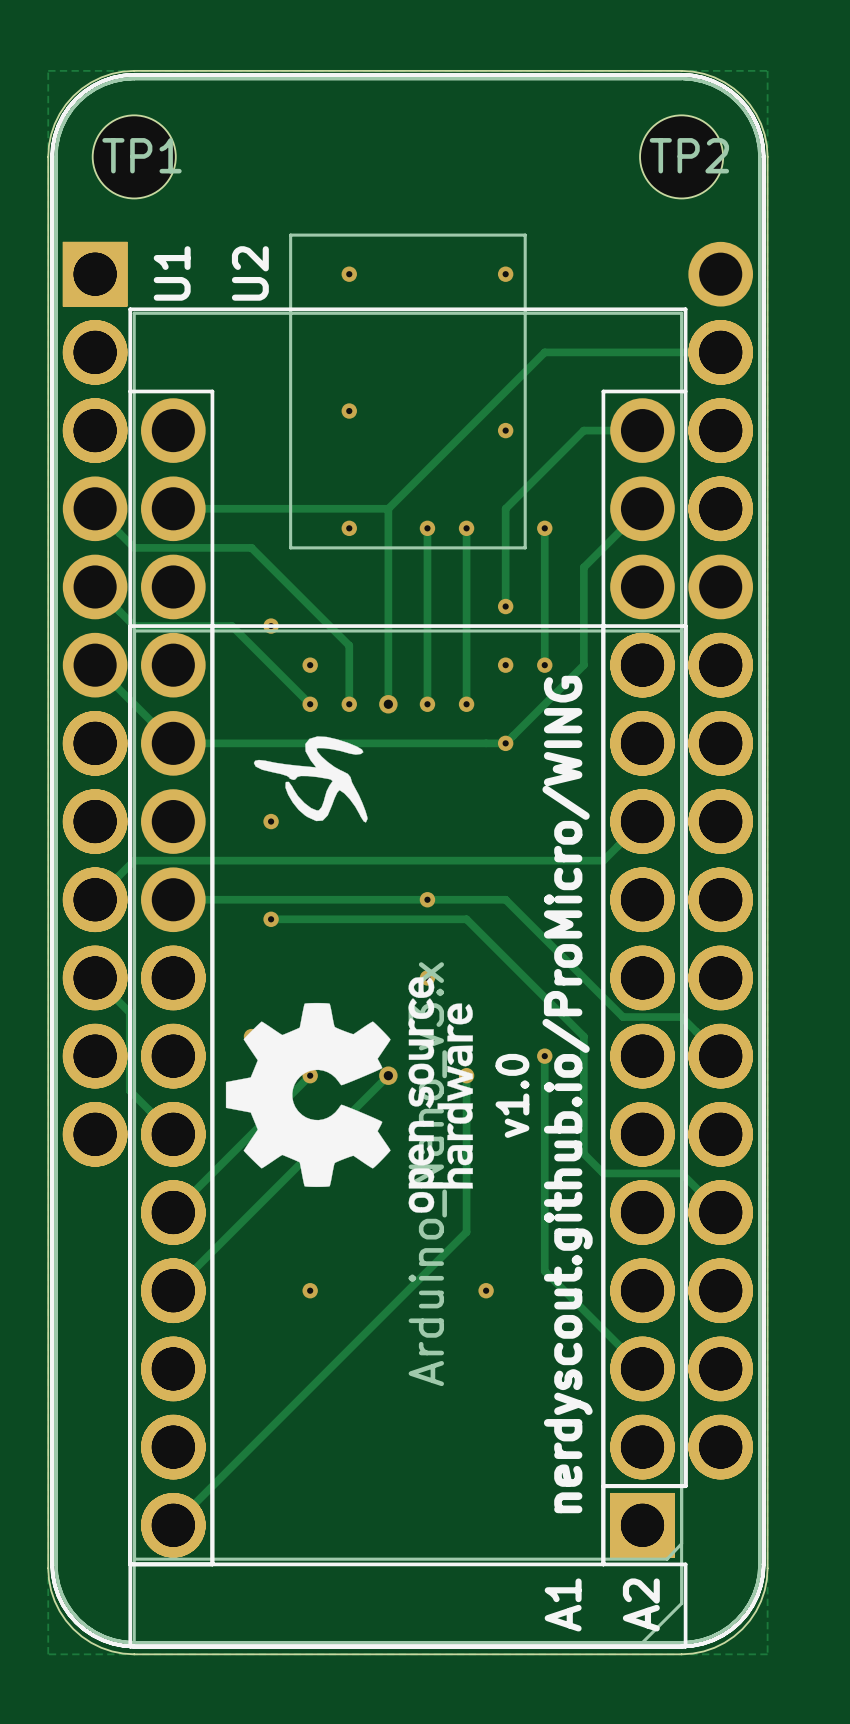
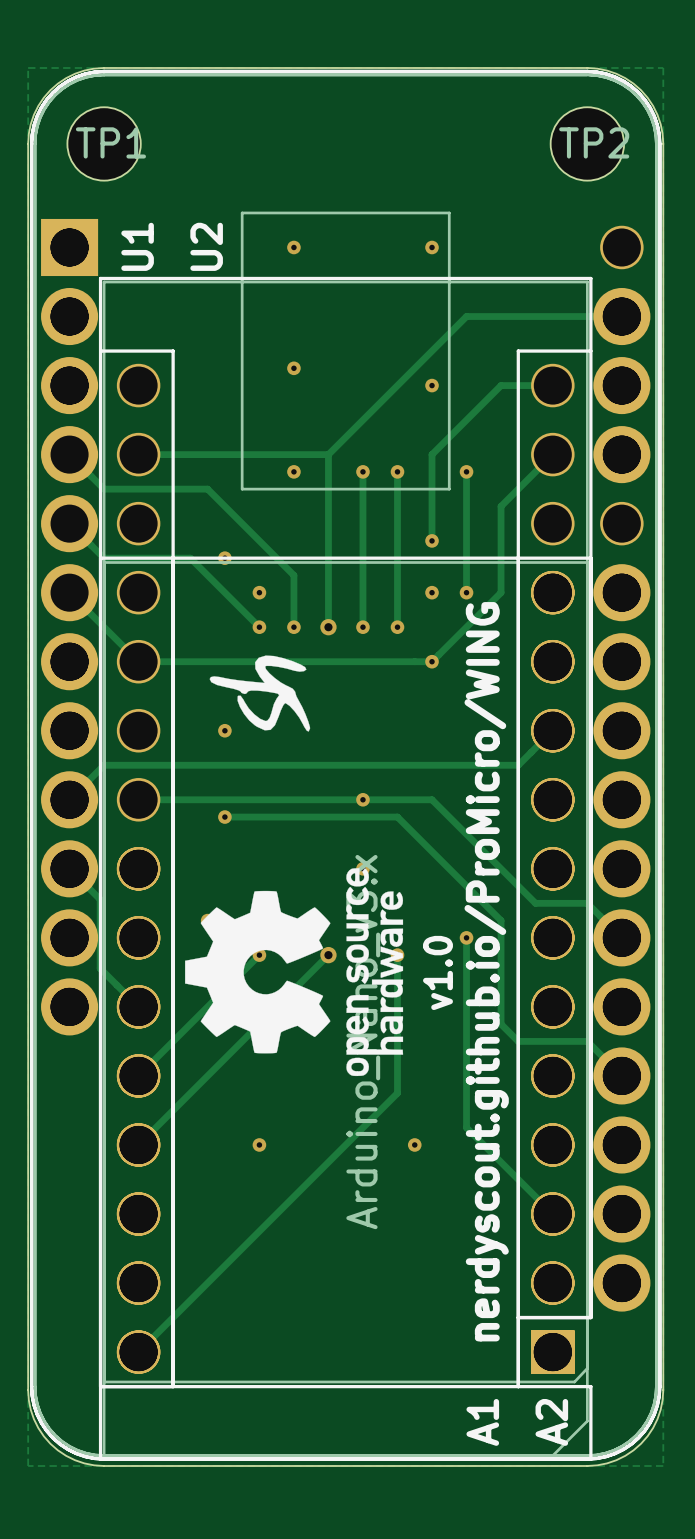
U2 footprint: [50, 72, 766, 1649] -> [29, 69, 662, 1461]
A2 footprint: [128, 233, 688, 1649] -> [98, 211, 593, 1461]
A1 footprint: [128, 624, 688, 1567] -> [98, 556, 593, 1389]

